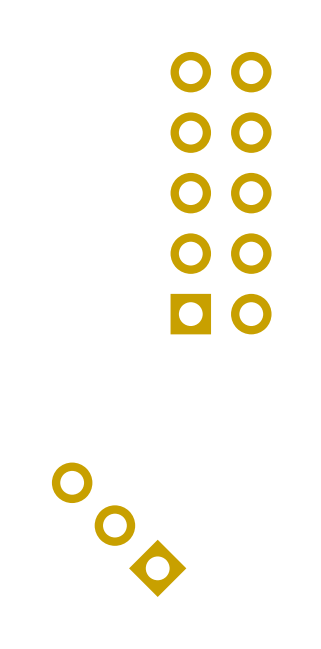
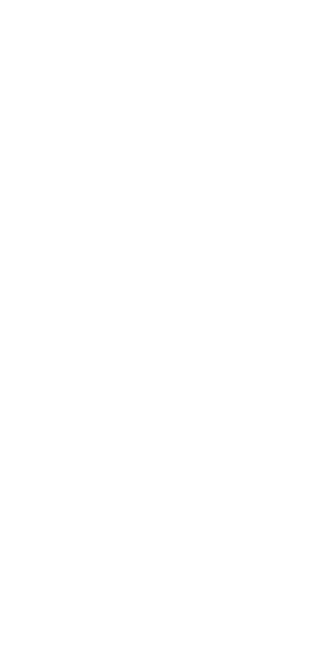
part: (221, 193) -> none
part: (119, 529) -> none

